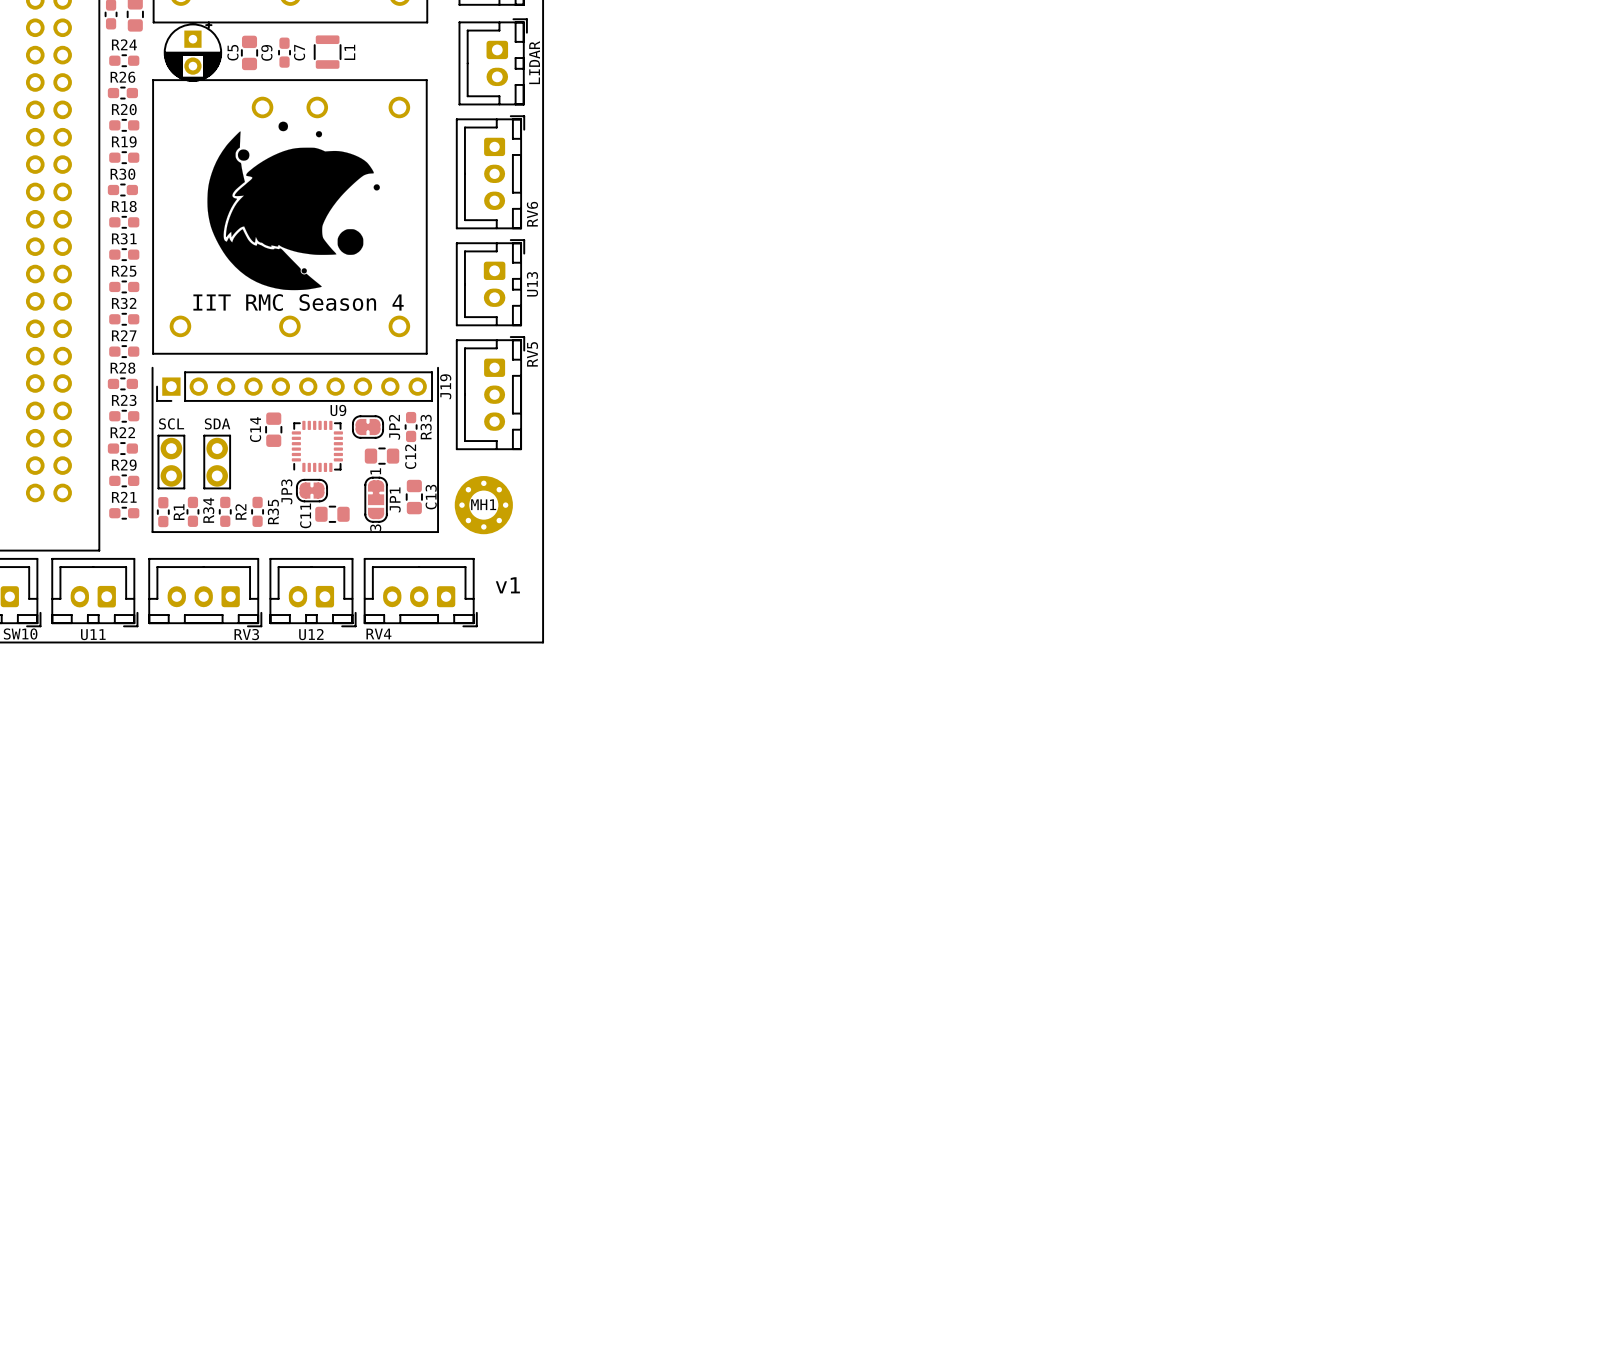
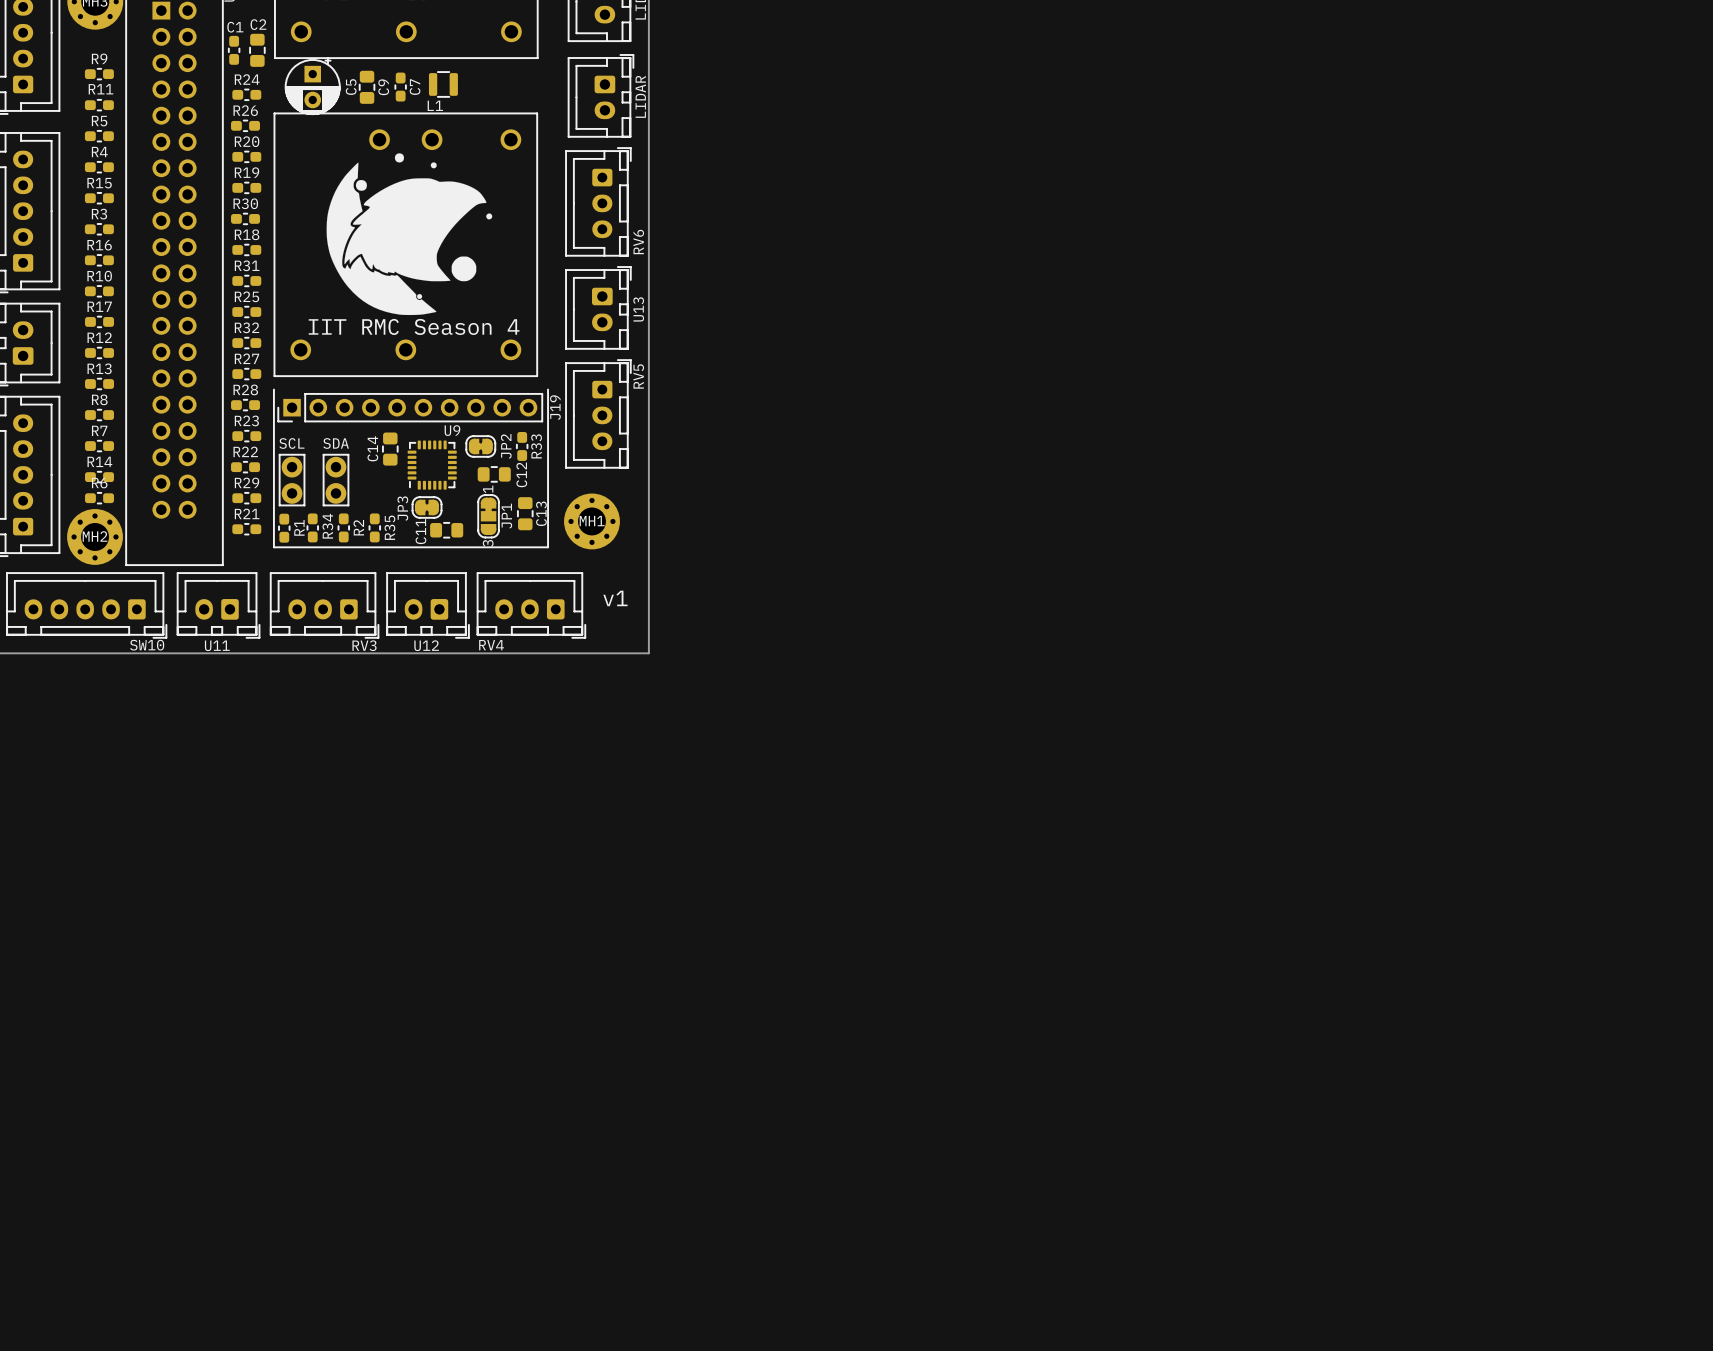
L1 footprint: [314, 35, 342, 69] -> [428, 71, 458, 98]
L1 name position: L1 (349, 52) -> L1 (435, 105)

